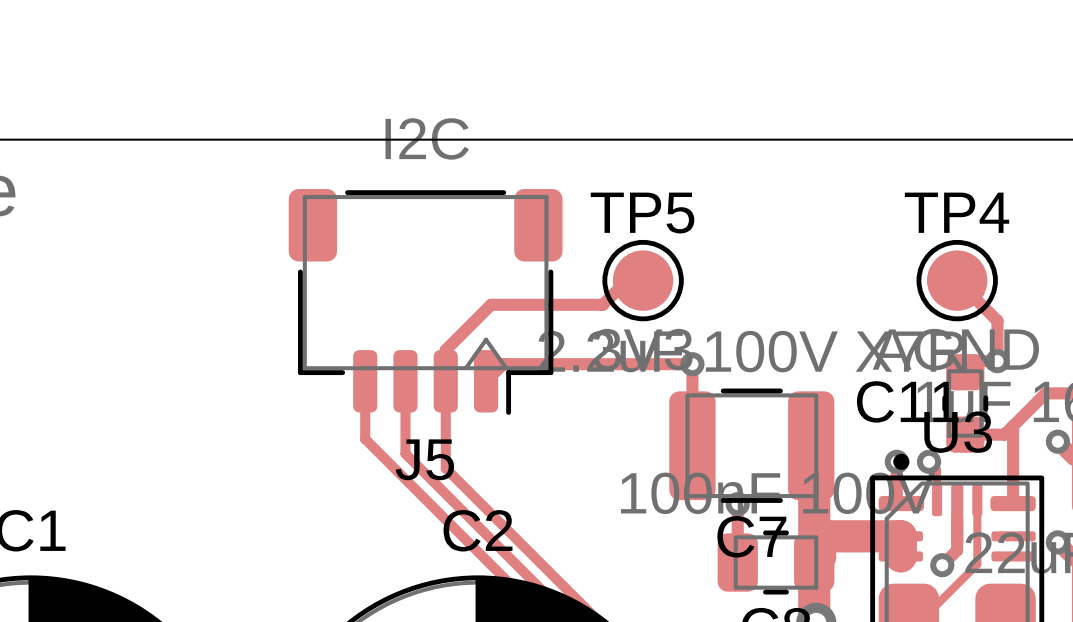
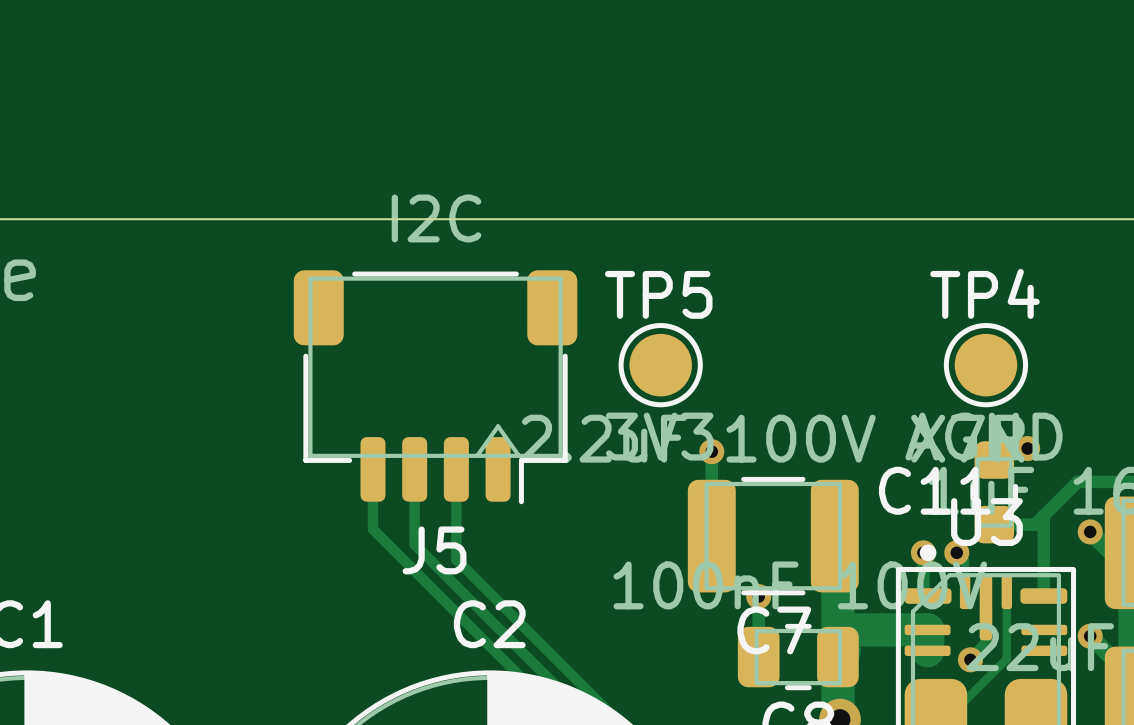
track: (643, 280) (626, 280) (602, 304) (491, 304) (445, 350) (445, 381) -> none
track: (957, 280) (997, 320) (997, 361) -> none
track: (692, 364) (503, 364) (486, 381) -> none

